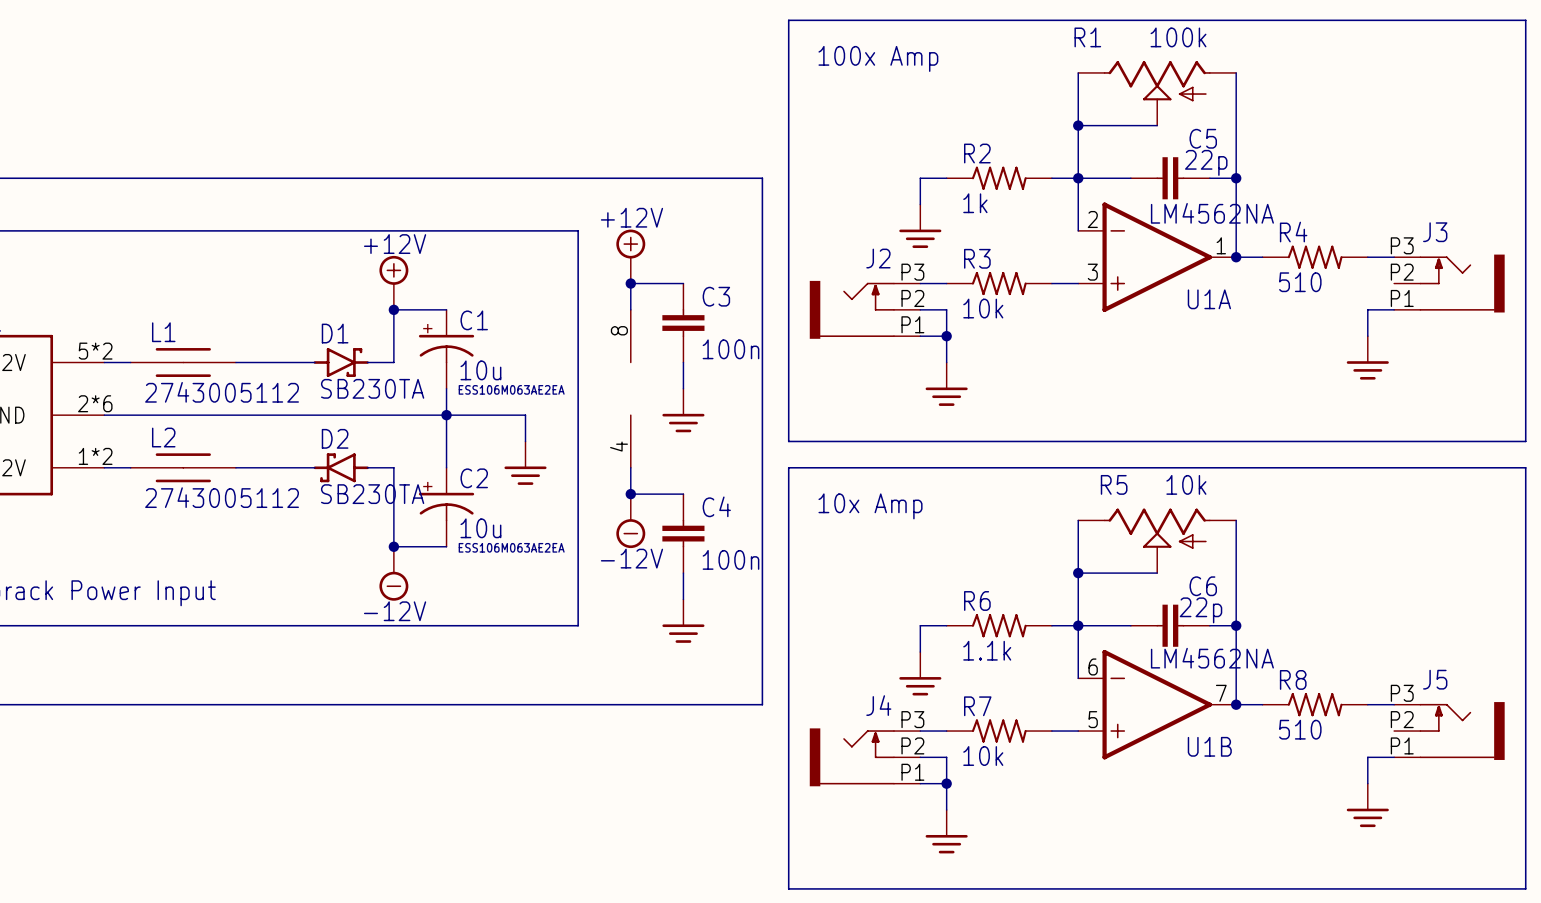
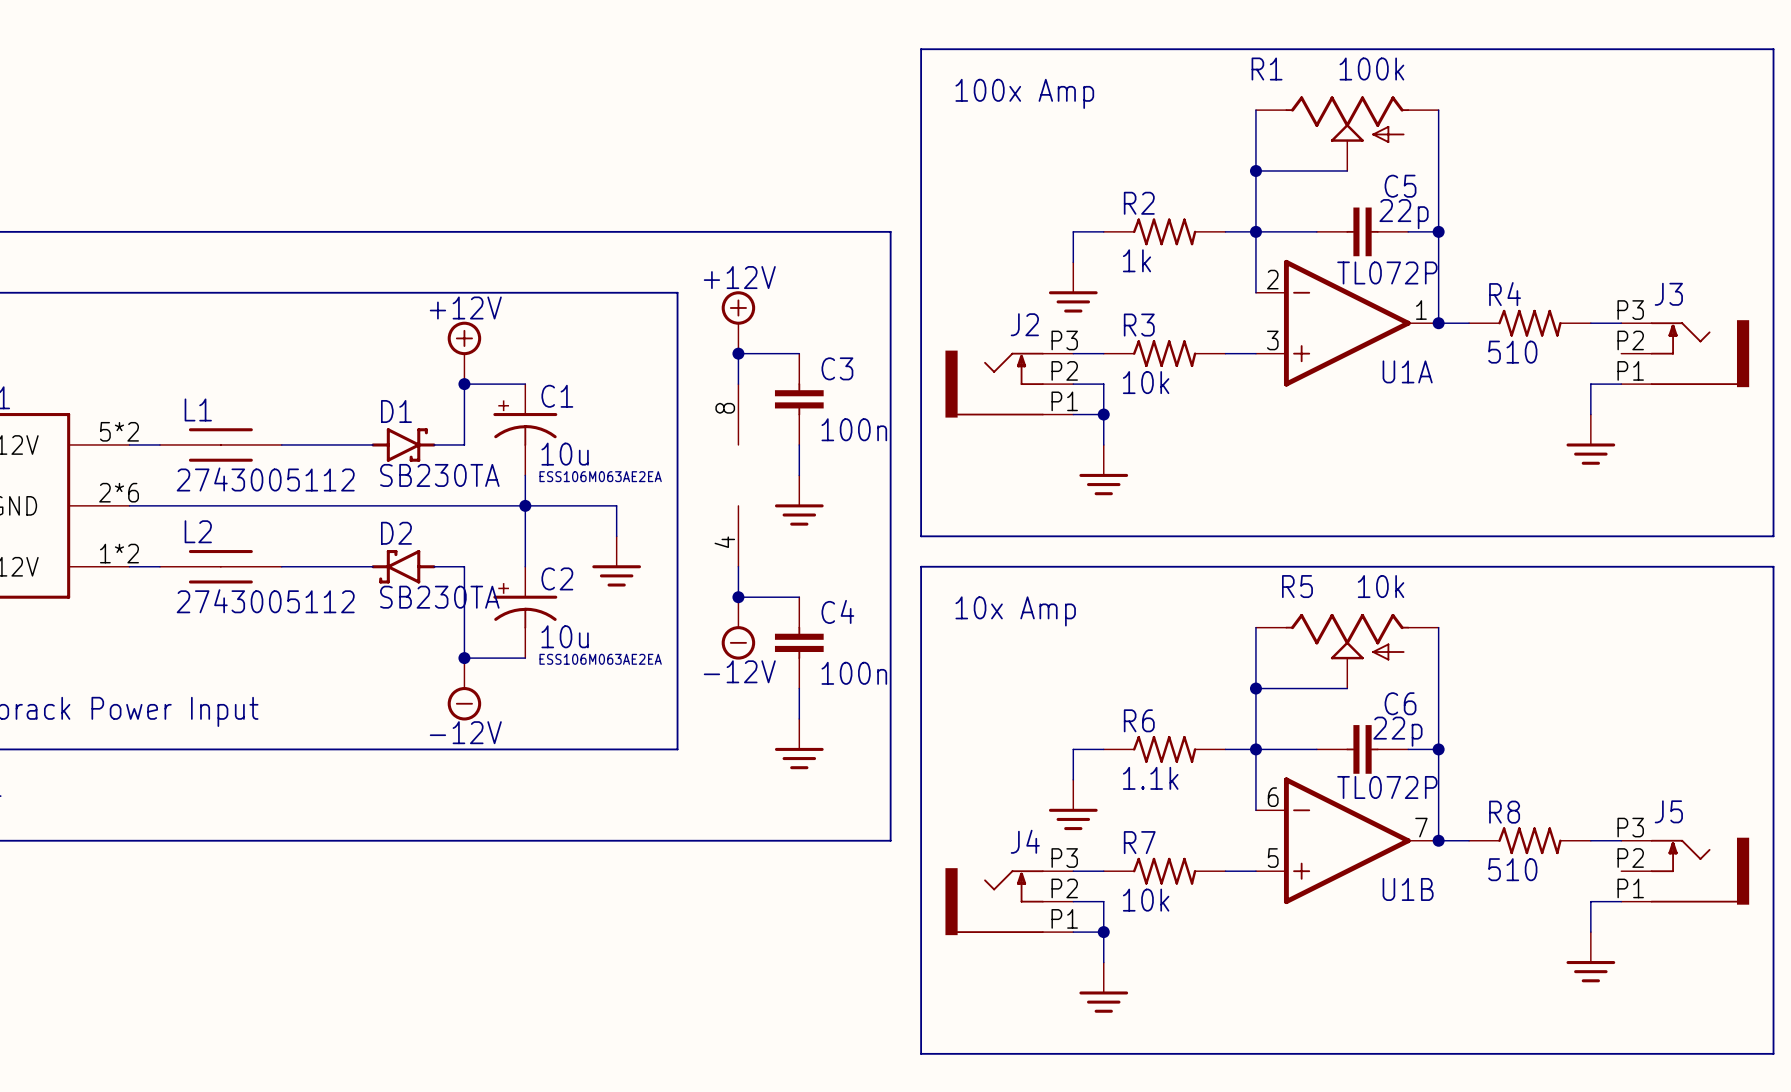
U1A value: LM4562NA (1212, 213) -> TL072P (1387, 272)
U1B value: LM4562NA (1212, 658) -> TL072P (1387, 787)

